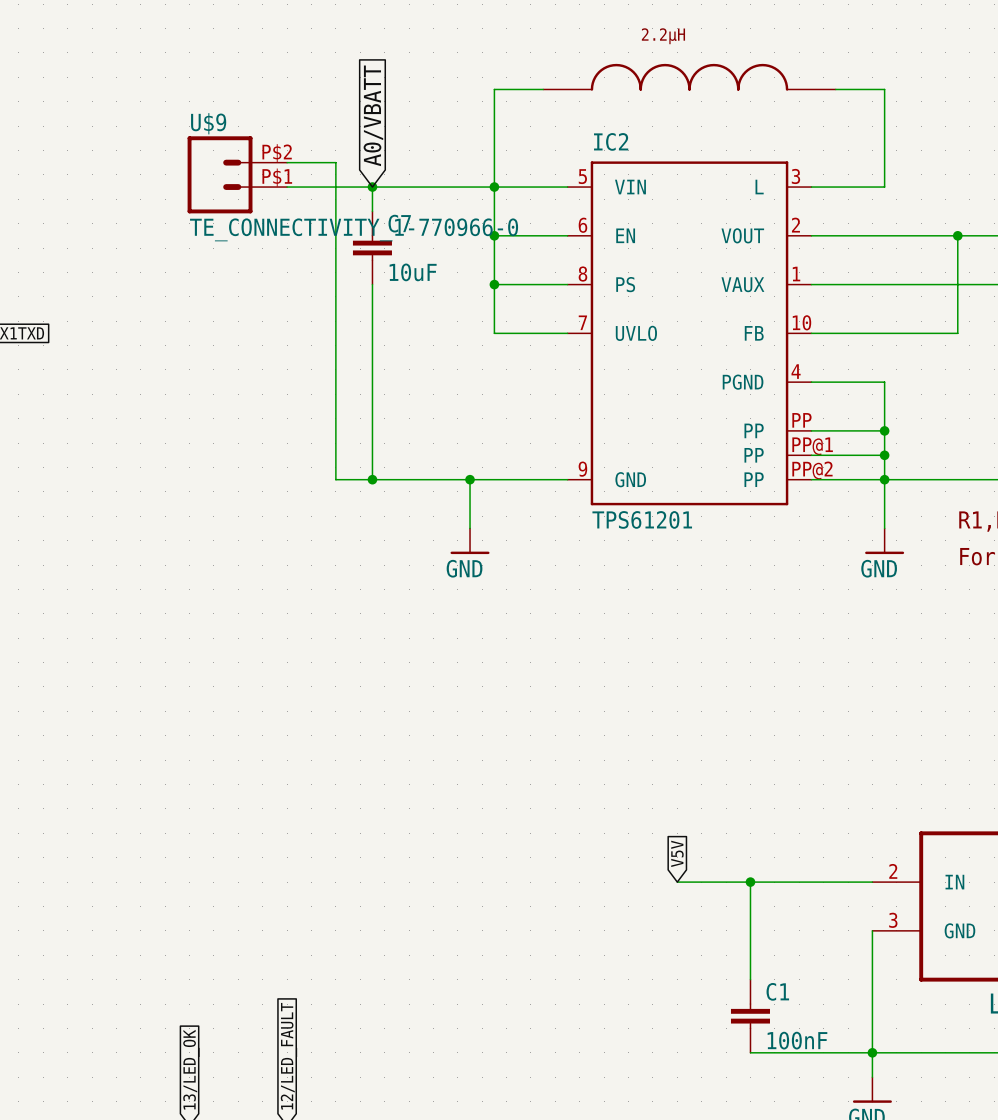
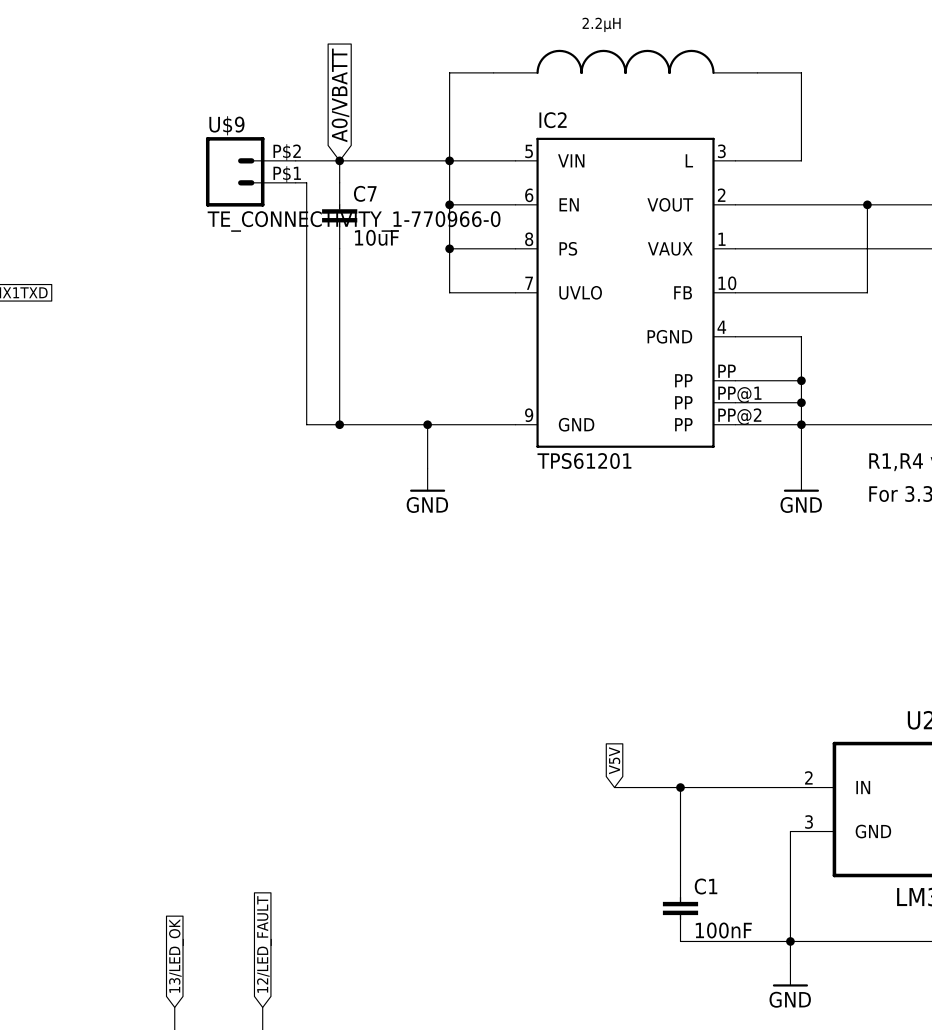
wire: (287, 162) (335, 162) (335, 211) -> (295, 182) (306, 182)
U$9 position: (237, 174) -> (250, 171)

